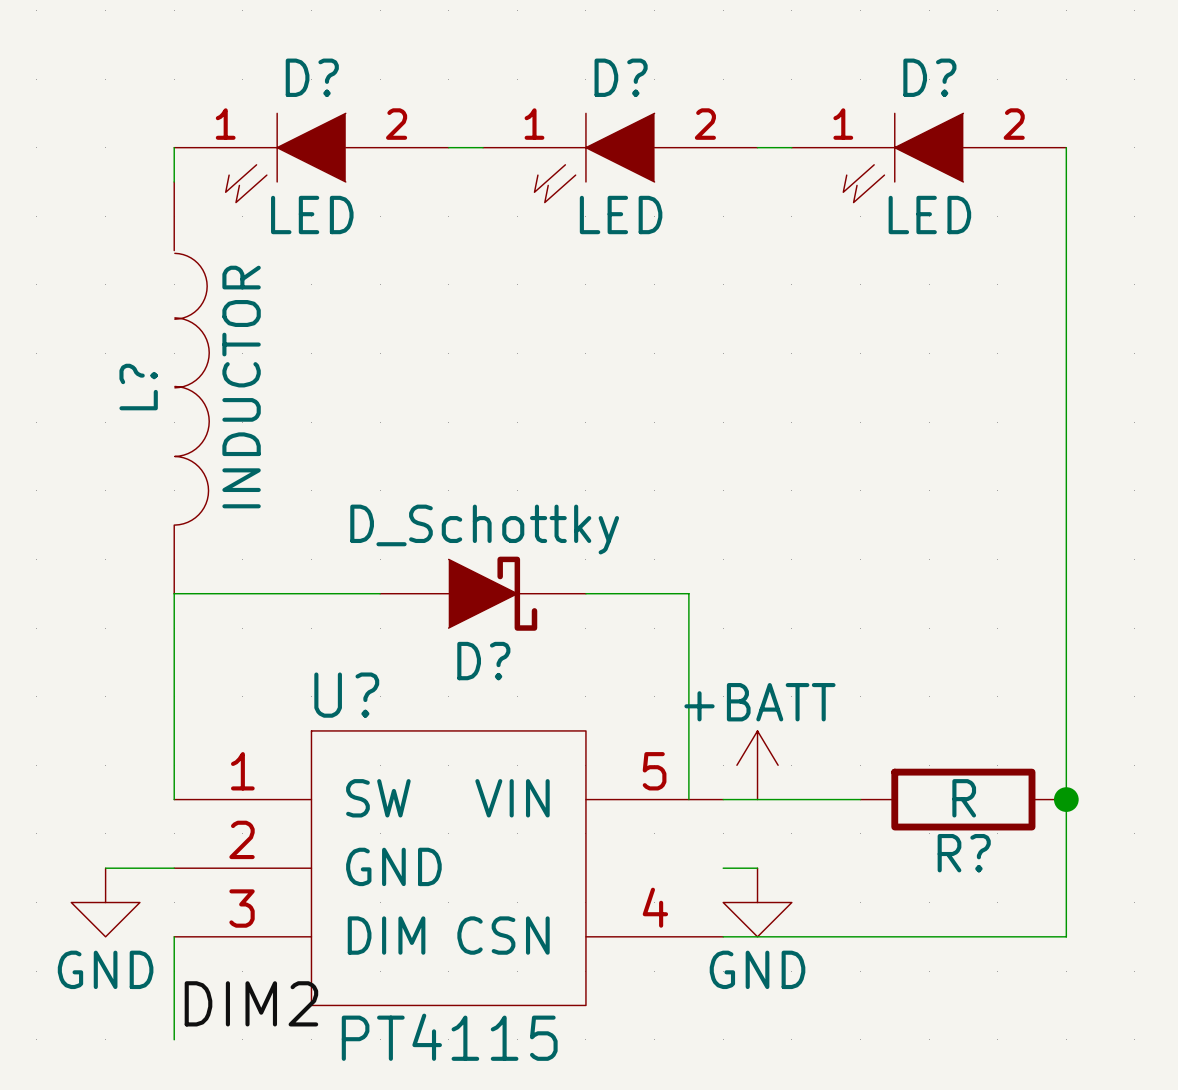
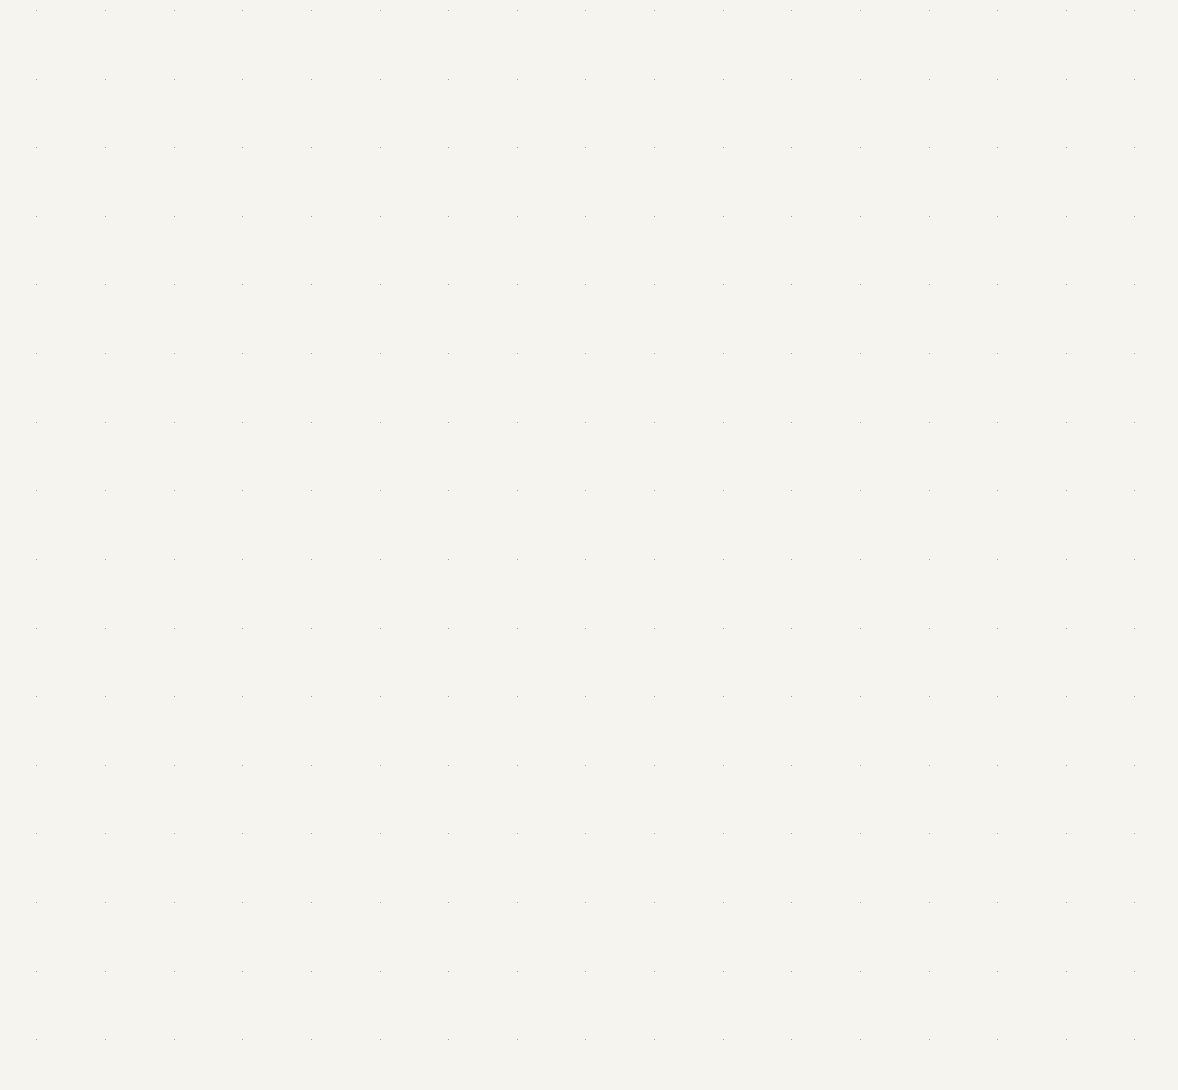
wire: (174, 147) (174, 181) -> none
wire: (448, 147) (483, 147) -> none
wire: (757, 147) (791, 147) -> none
wire: (1066, 147) (1066, 936) (723, 936) -> none
D?: LED (311, 157) -> none
D?: LED (620, 157) -> none
D?: LED (929, 157) -> none
L?: INDUCTOR (191, 387) -> none
wire: (380, 593) (174, 593) (174, 799) -> none
D?: D_Schottky (483, 593) -> none
wire: (585, 593) (688, 593) (688, 799) -> none
power symbol: +BATT (757, 765) -> none
wire: (723, 799) (860, 799) -> none
R?: R (963, 799) -> none
junction: (1066, 799) -> none
wire: (105, 868) (174, 868) -> none
U?: PT4115 (448, 868) -> none
wire: (723, 868) (757, 868) -> none
power symbol: GND (105, 902) -> none
power symbol: GND (757, 902) -> none
wire: (174, 936) (174, 1039) -> none
label: DIM2 (251, 1003) -> none

